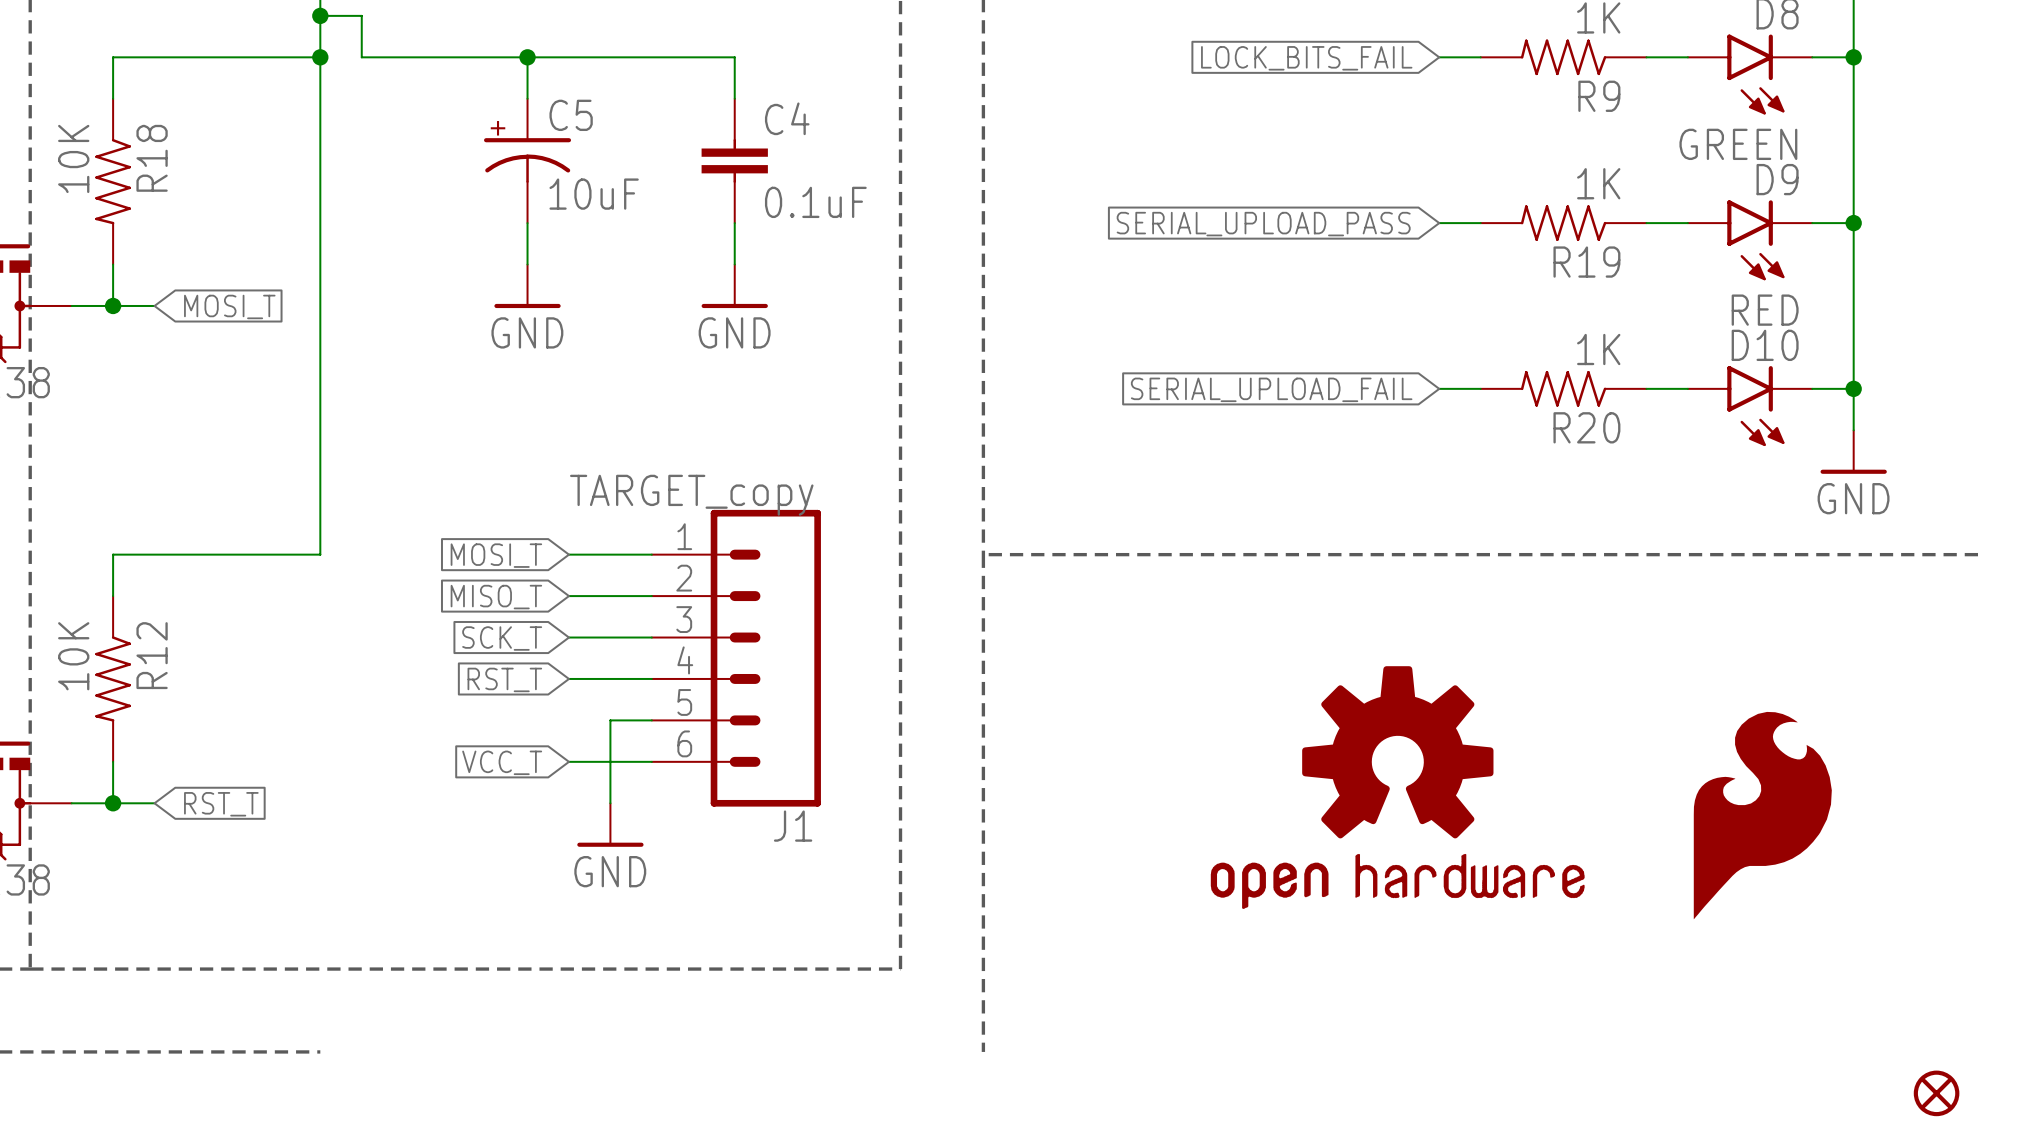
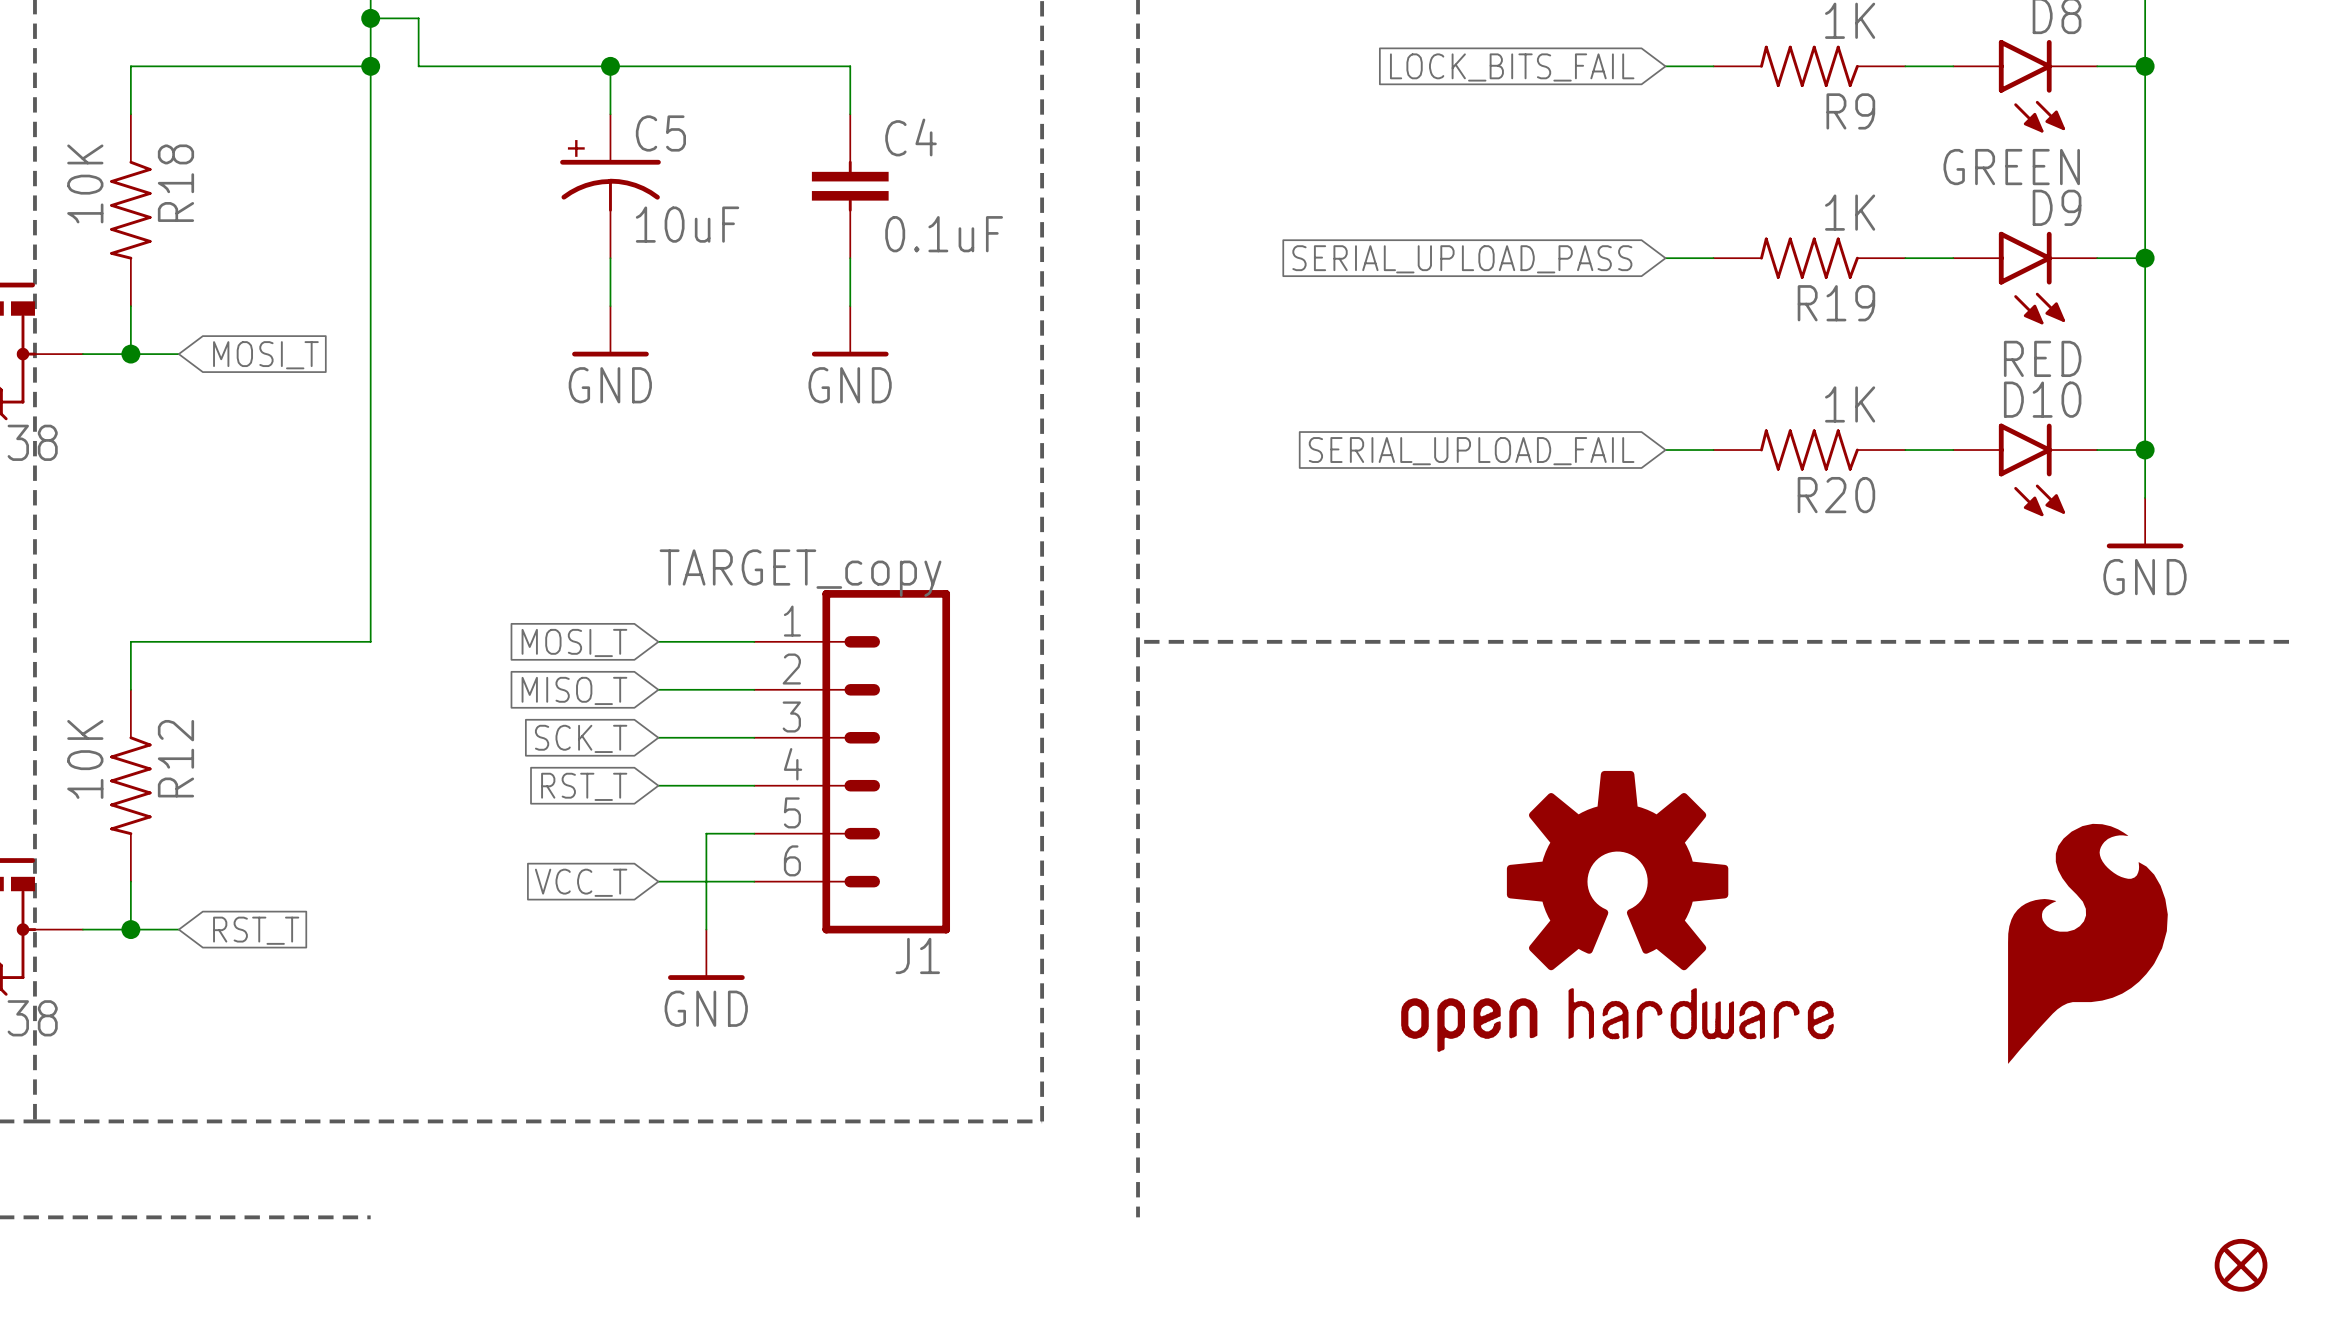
part position: (1762, 815) -> (2087, 943)

